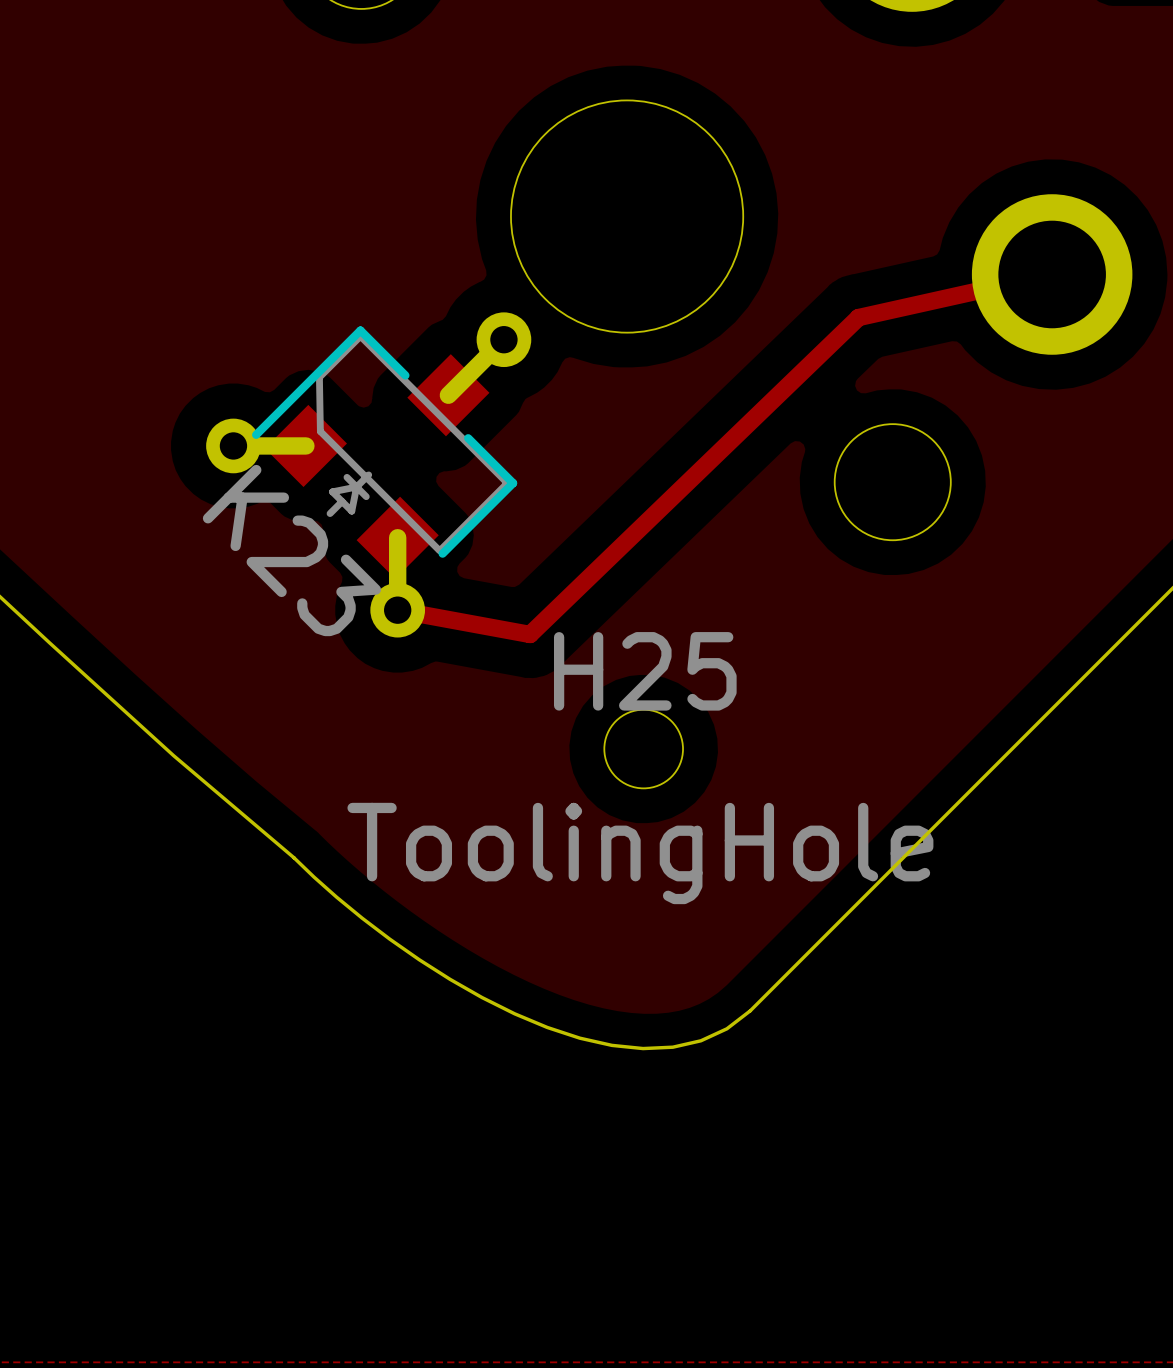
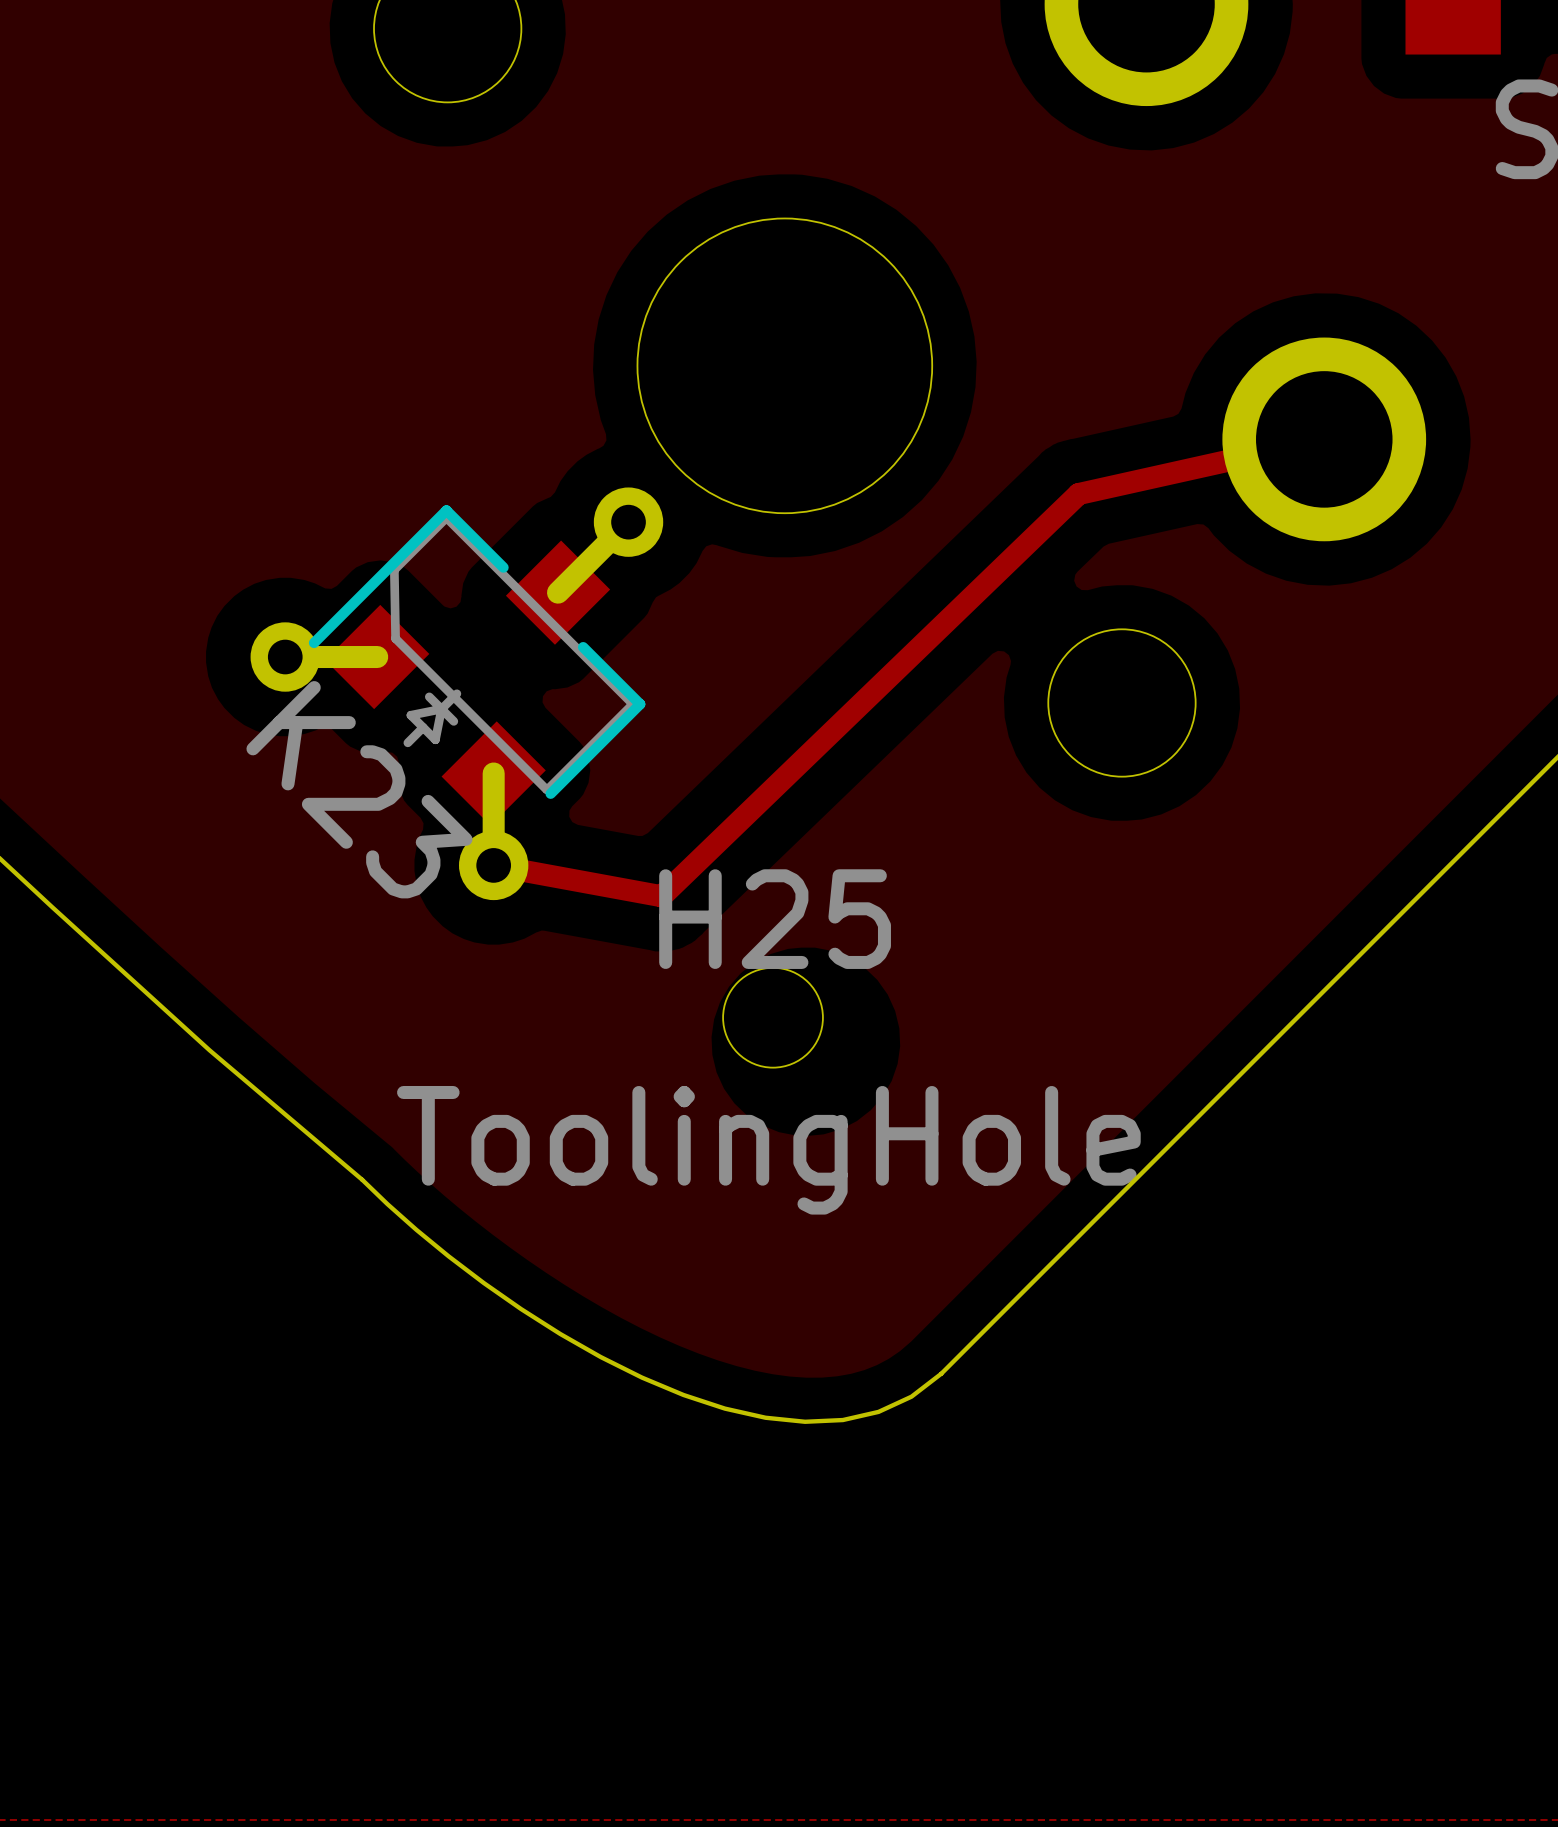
H25 position: (643, 749) -> (773, 1017)

